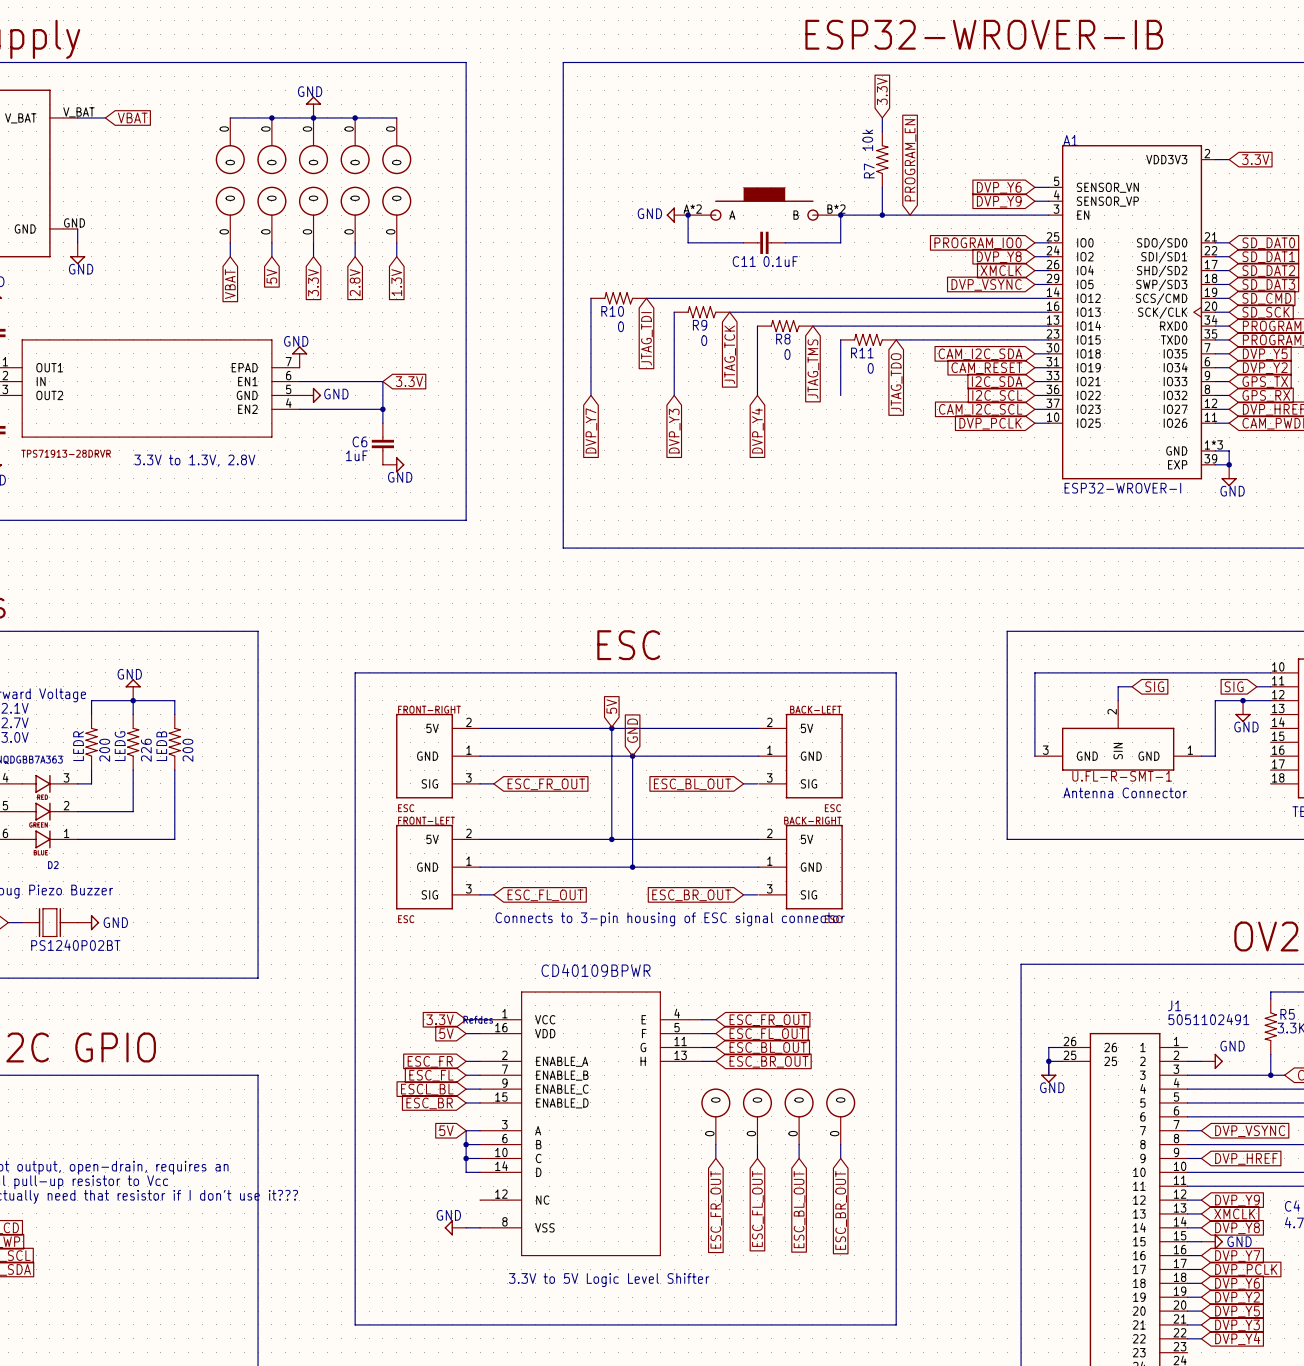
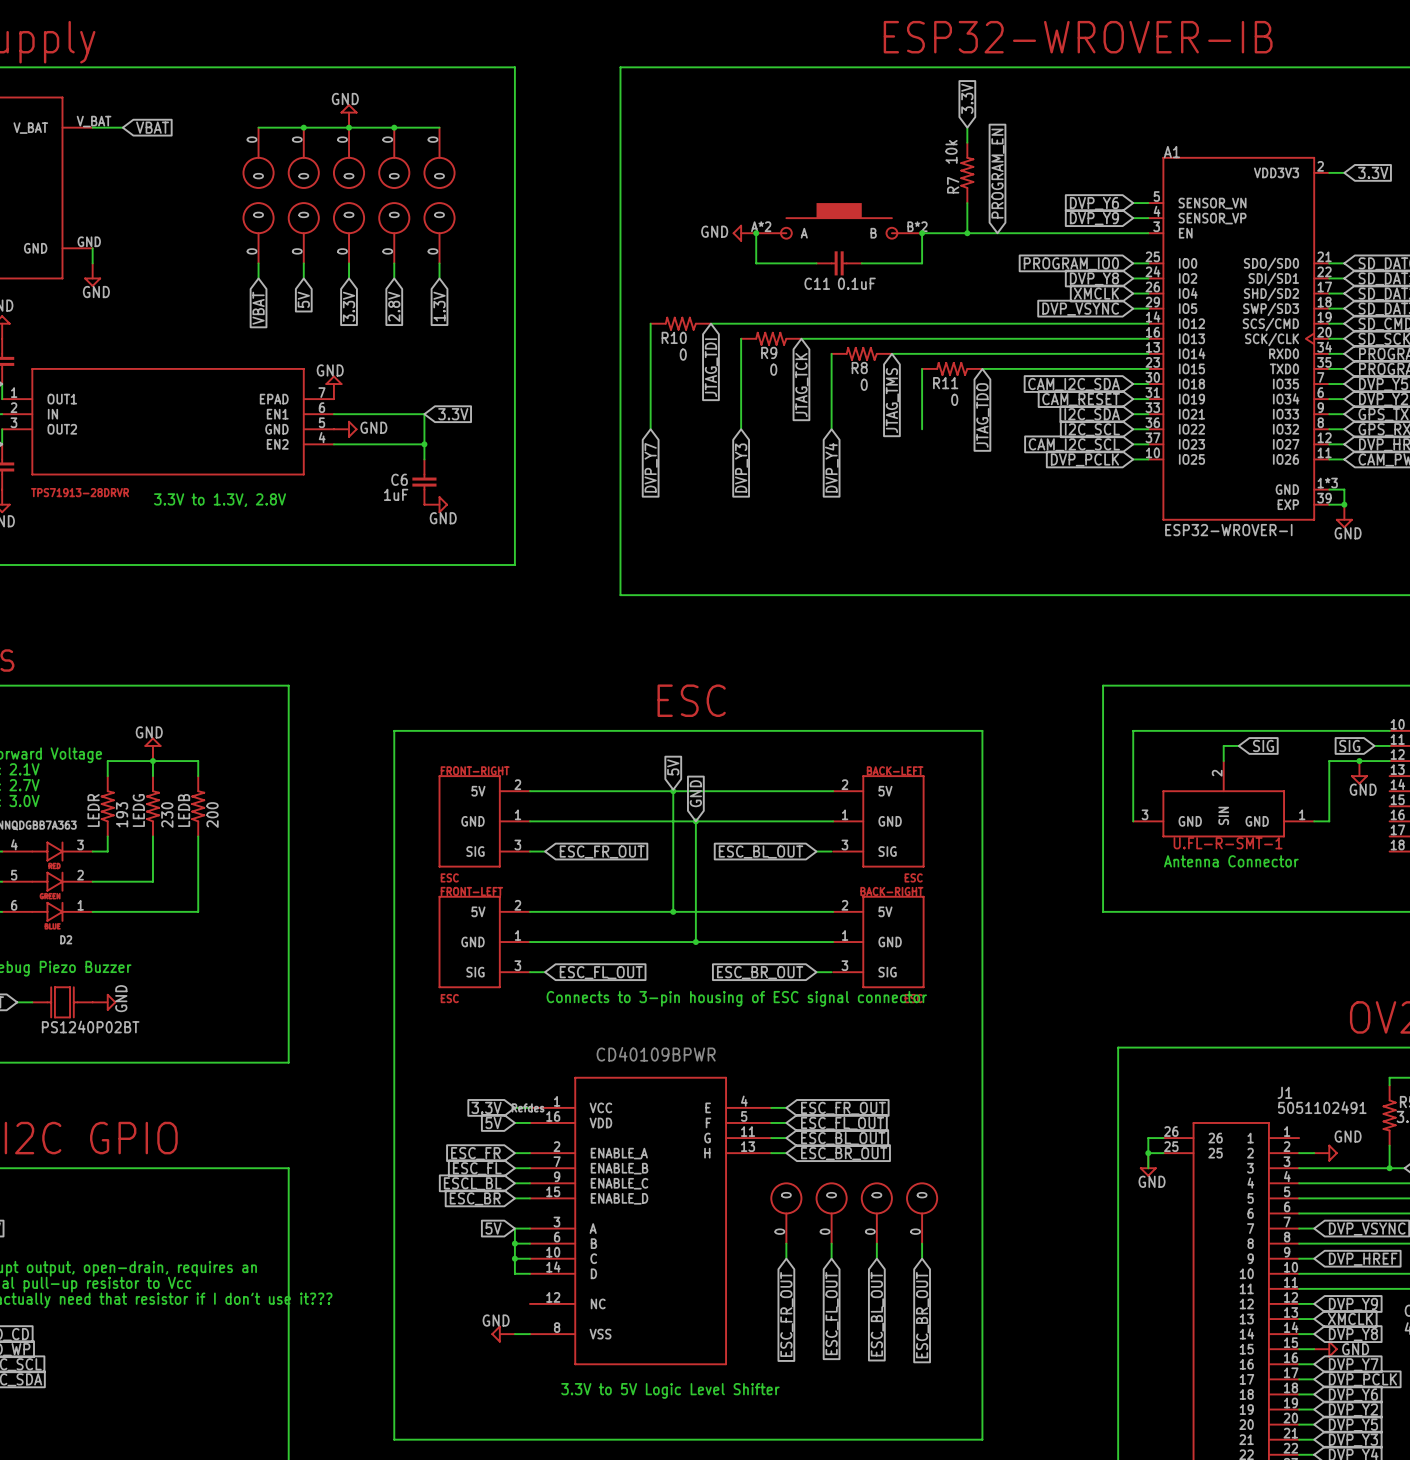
LEDR value: 200 (104, 750) -> 193 (122, 814)
LEDG value: 226 (146, 750) -> 230 (167, 815)
power symbol text rotation: 0° (115, 922) -> 90° counterclockwise (121, 998)

